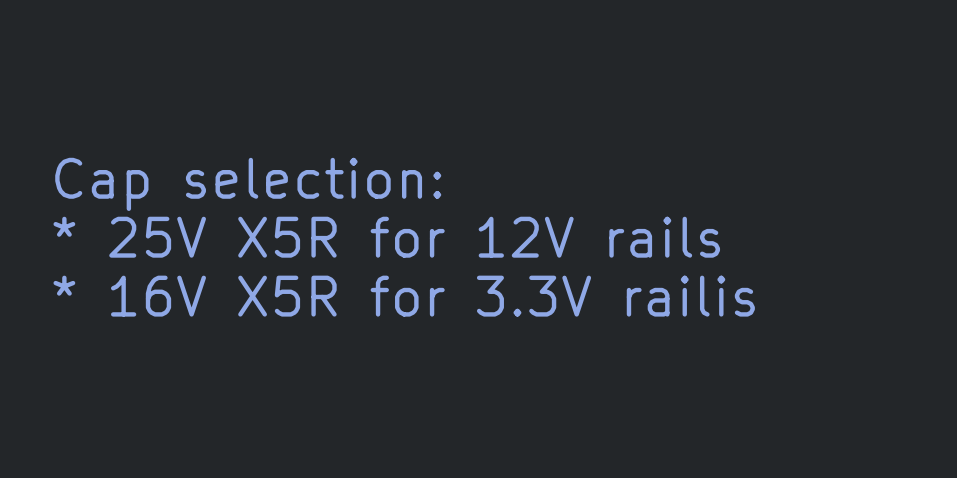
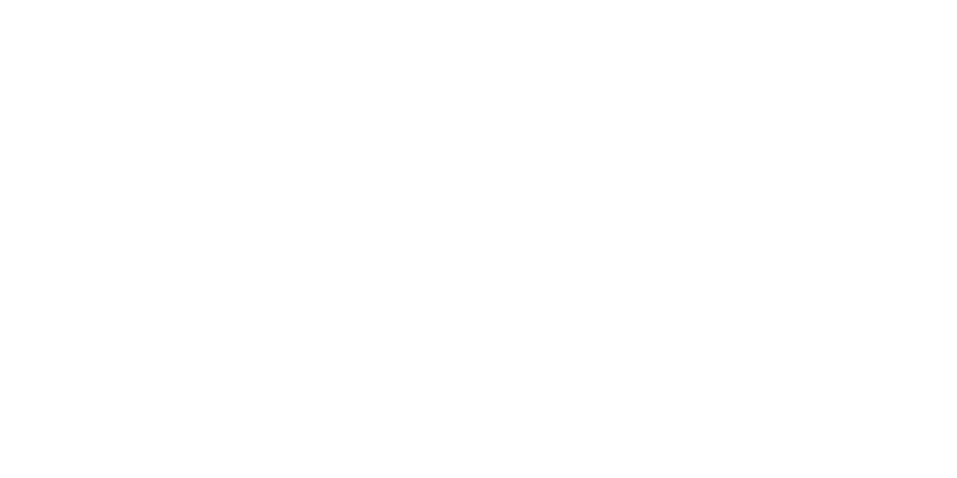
text: Cap selection: (248, 184) -> none
text: * 25V X5R for 12V rails (386, 237) -> none
text: * 16V X5R for 3.3V railis (404, 296) -> none

